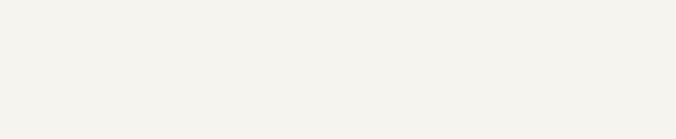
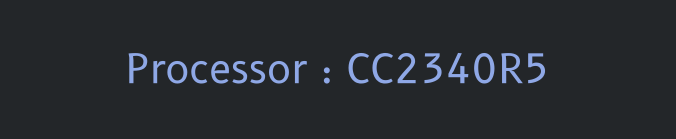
text: none -> Processor : CC2340R5 (336, 68)

